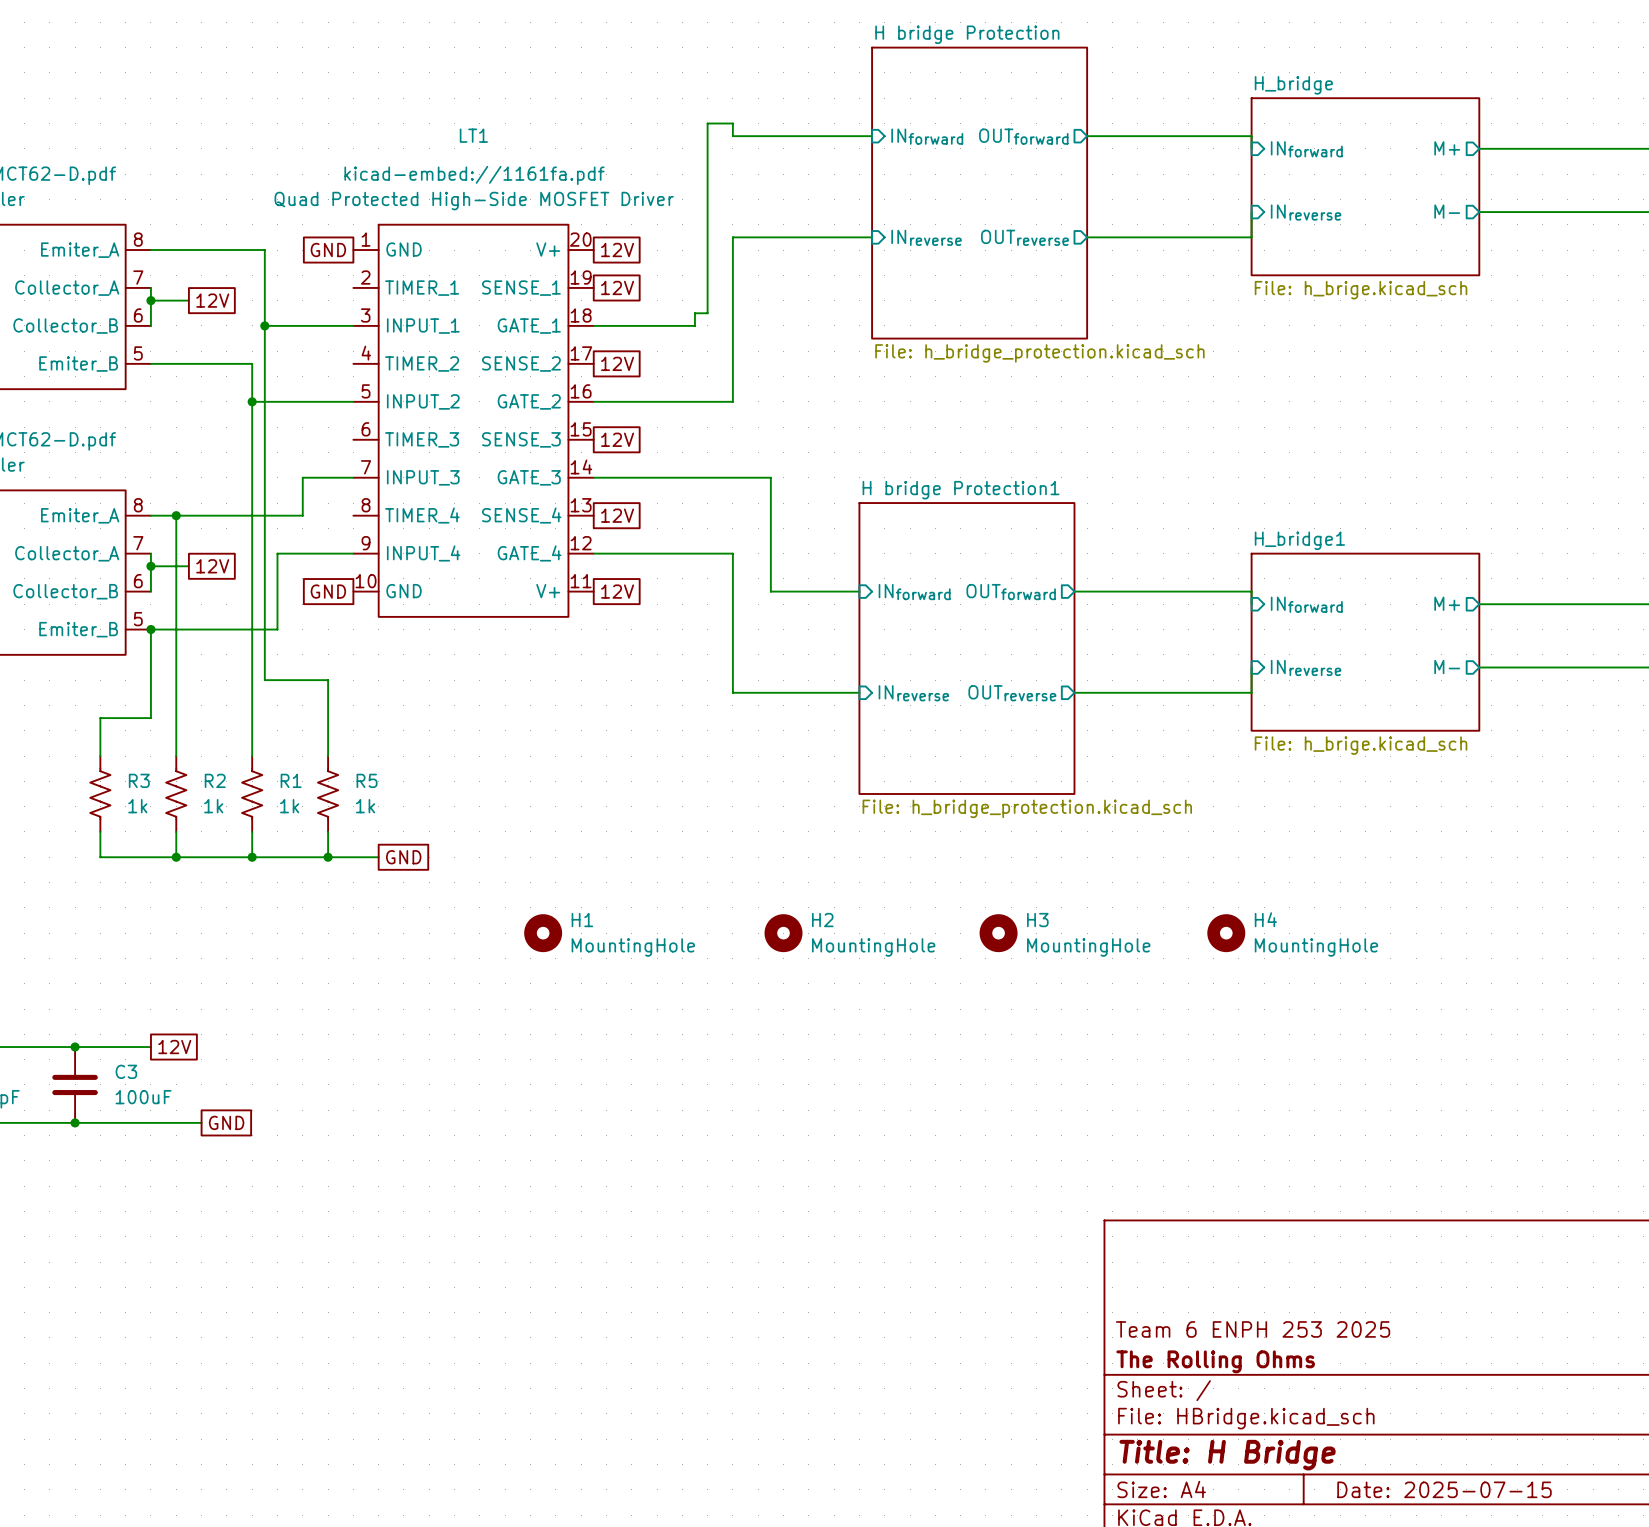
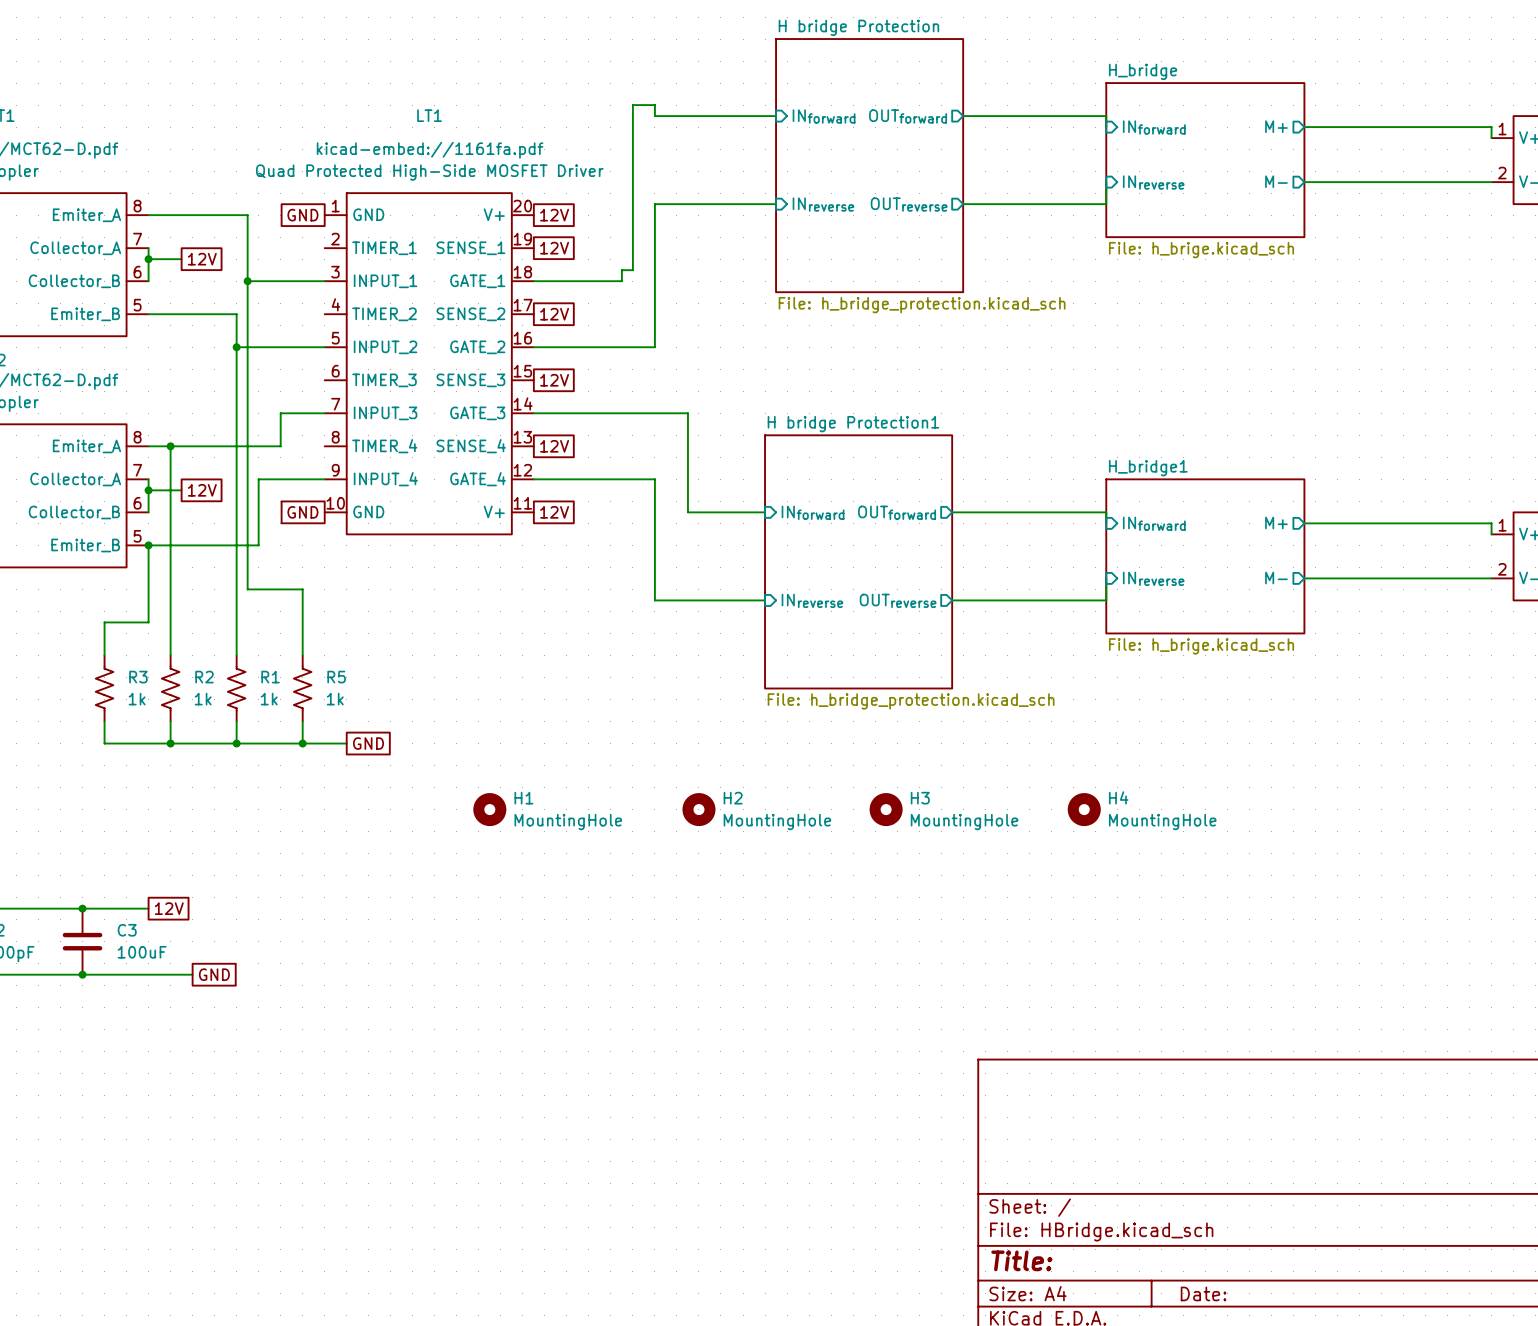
title block: Team 6 ENPH 253 2025 (1253, 1329) -> none
title block: The Rolling Ohms (1215, 1361) -> none
title block: Title: H Bridge (1227, 1455) -> Title: (1021, 1260)
title block: Date: 2025-07-15 (1444, 1489) -> Date: (1203, 1293)

